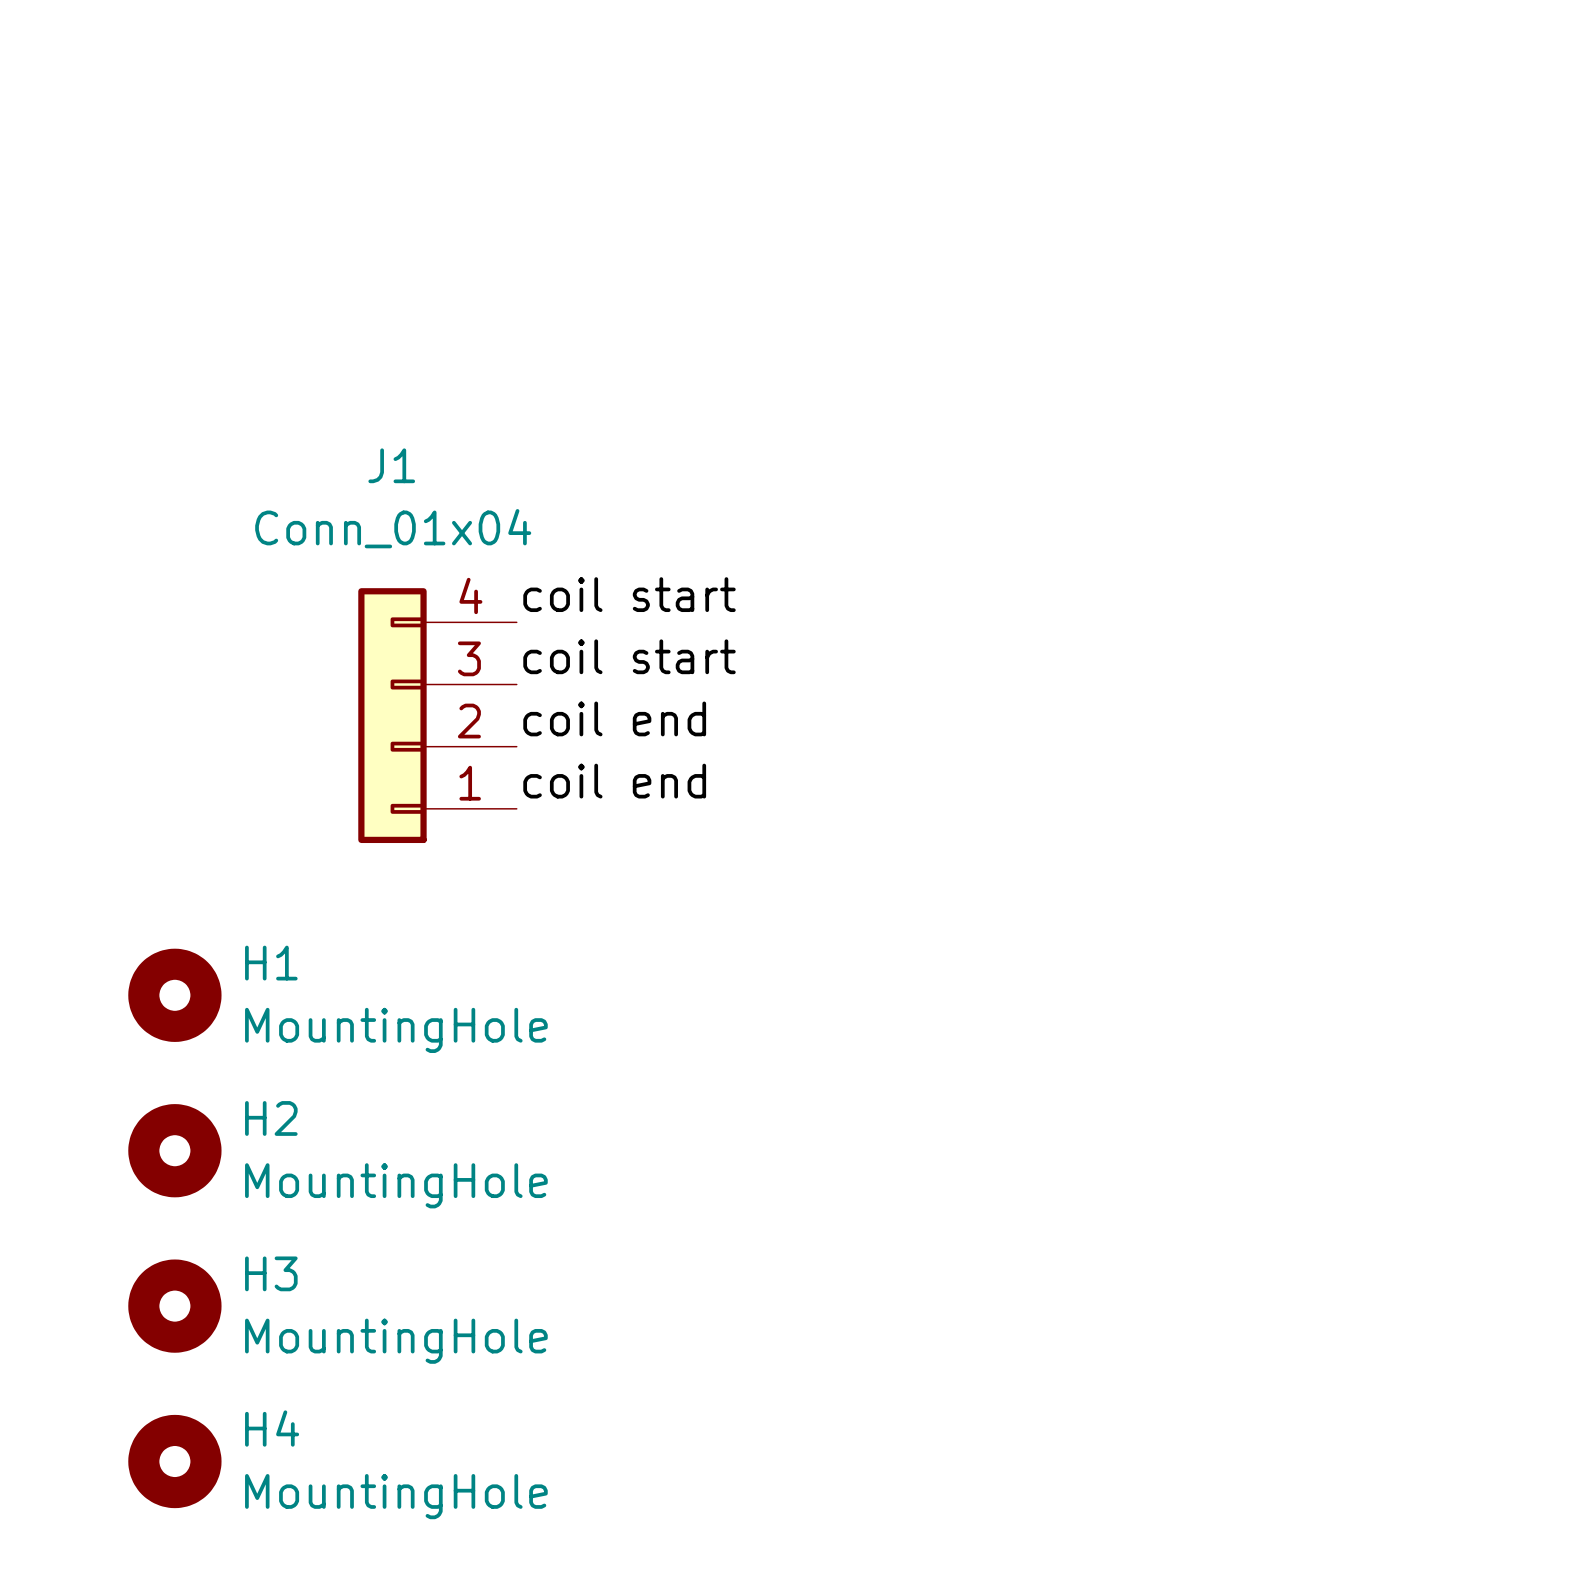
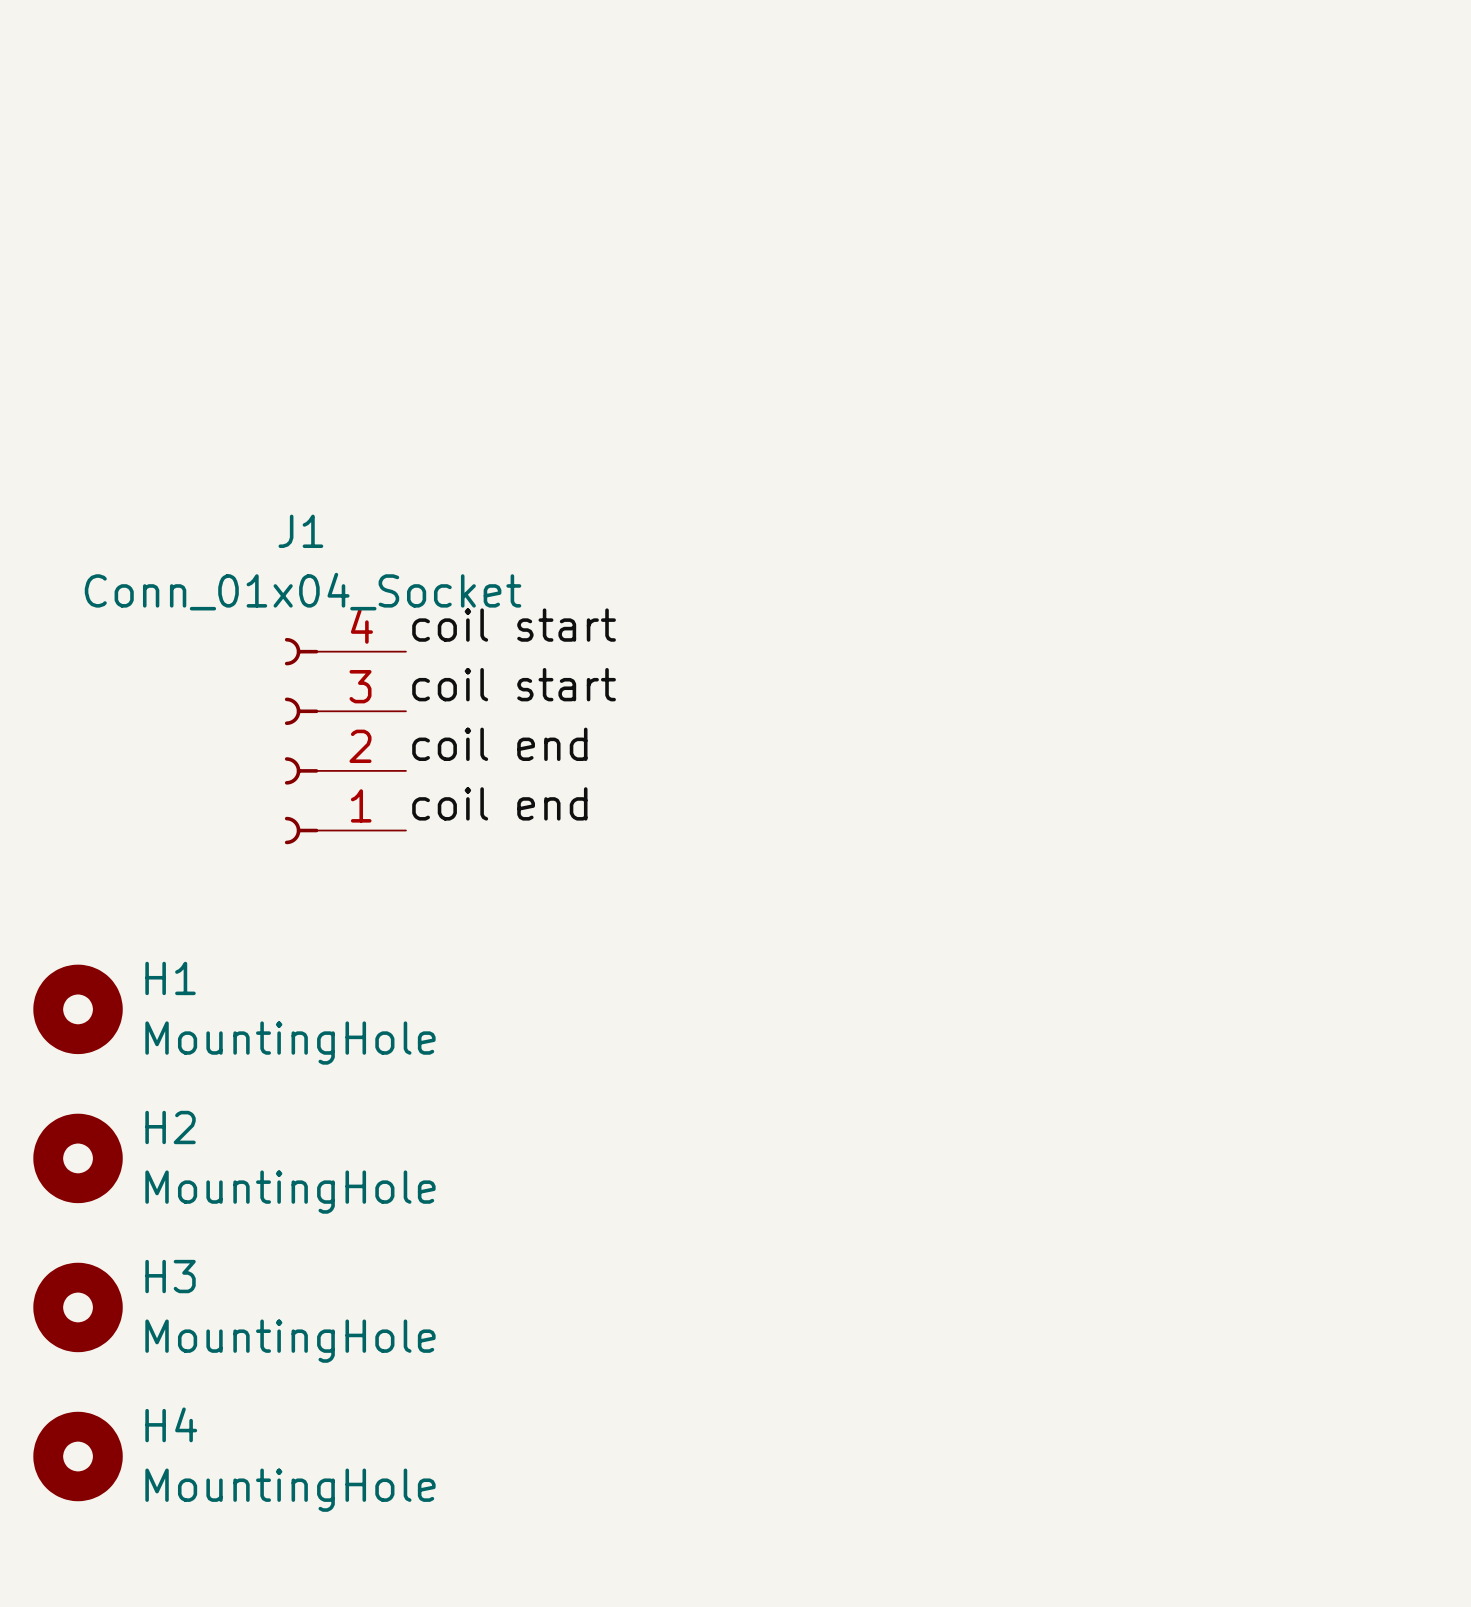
J1 value: Conn_01x04 (393, 528) -> Conn_01x04_Socket (303, 591)
J1 symbol: [358, 588, 517, 844] -> [284, 637, 406, 845]

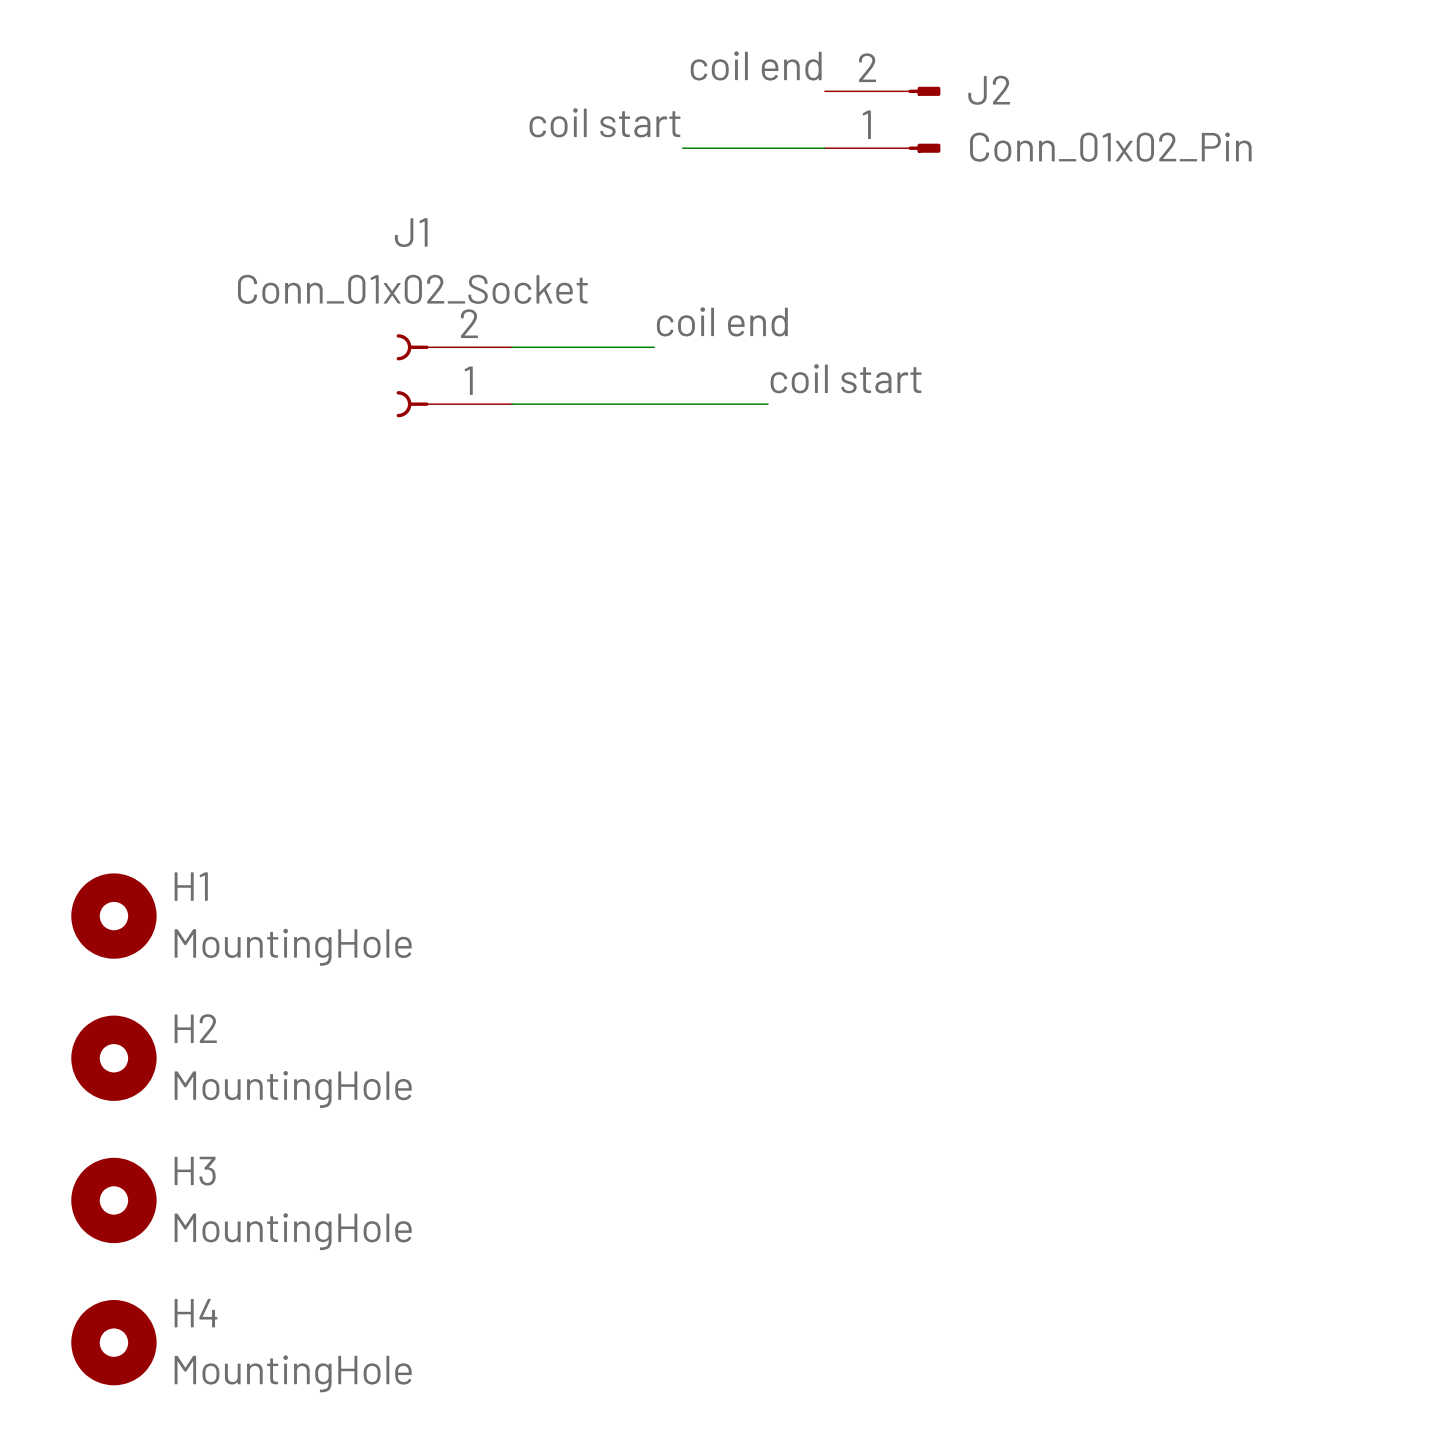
label: none -> coil end (756, 65)
J2: none -> Conn_01x02_Pin (882, 119)
label: none -> coil start (604, 122)
wire: none -> (682, 148) (824, 148)
label: none -> coil end (722, 321)
wire: none -> (512, 347) (654, 347)
label: none -> coil start (846, 378)
wire: none -> (512, 404) (768, 404)
J1 name position: J1 (300, 531) -> J1 (411, 232)
J1 value: Conn_01x04_Socket (303, 591) -> Conn_01x02_Socket (412, 289)
label: coil start (514, 625) -> none
J1 symbol: [284, 637, 406, 845] -> [396, 334, 513, 418]
label: coil start (514, 684) -> none
label: coil end (499, 744) -> none
label: coil end (499, 803) -> none

